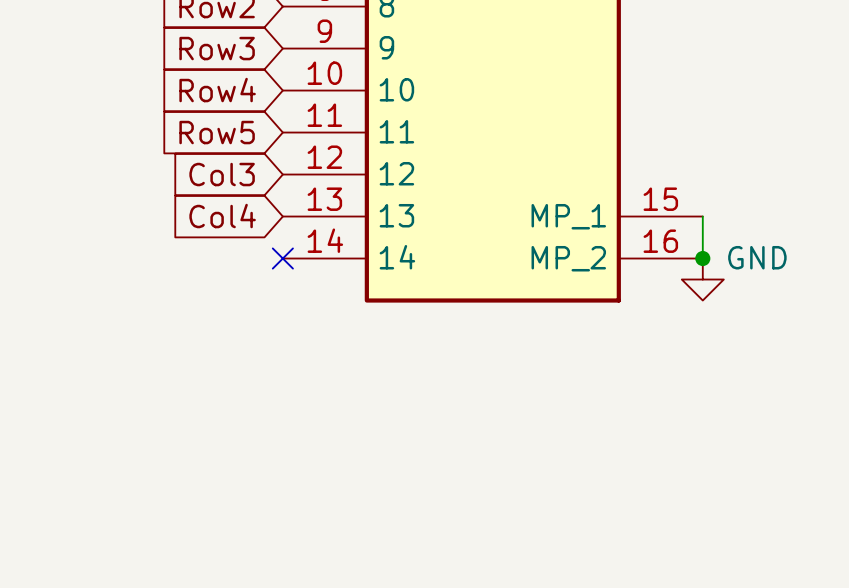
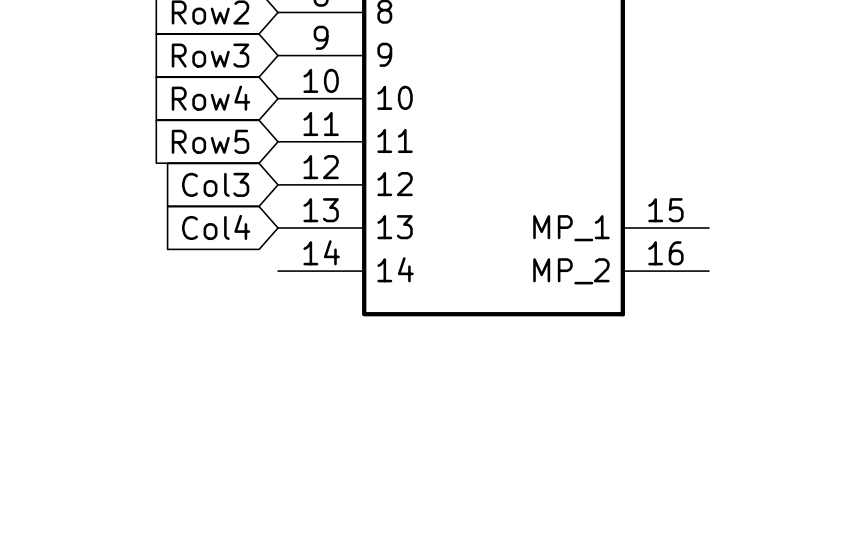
wire: (702, 216) (702, 258) -> none
no-connect mark: (282, 258) -> none
junction: (702, 258) -> none
power symbol: GND (702, 279) -> none

